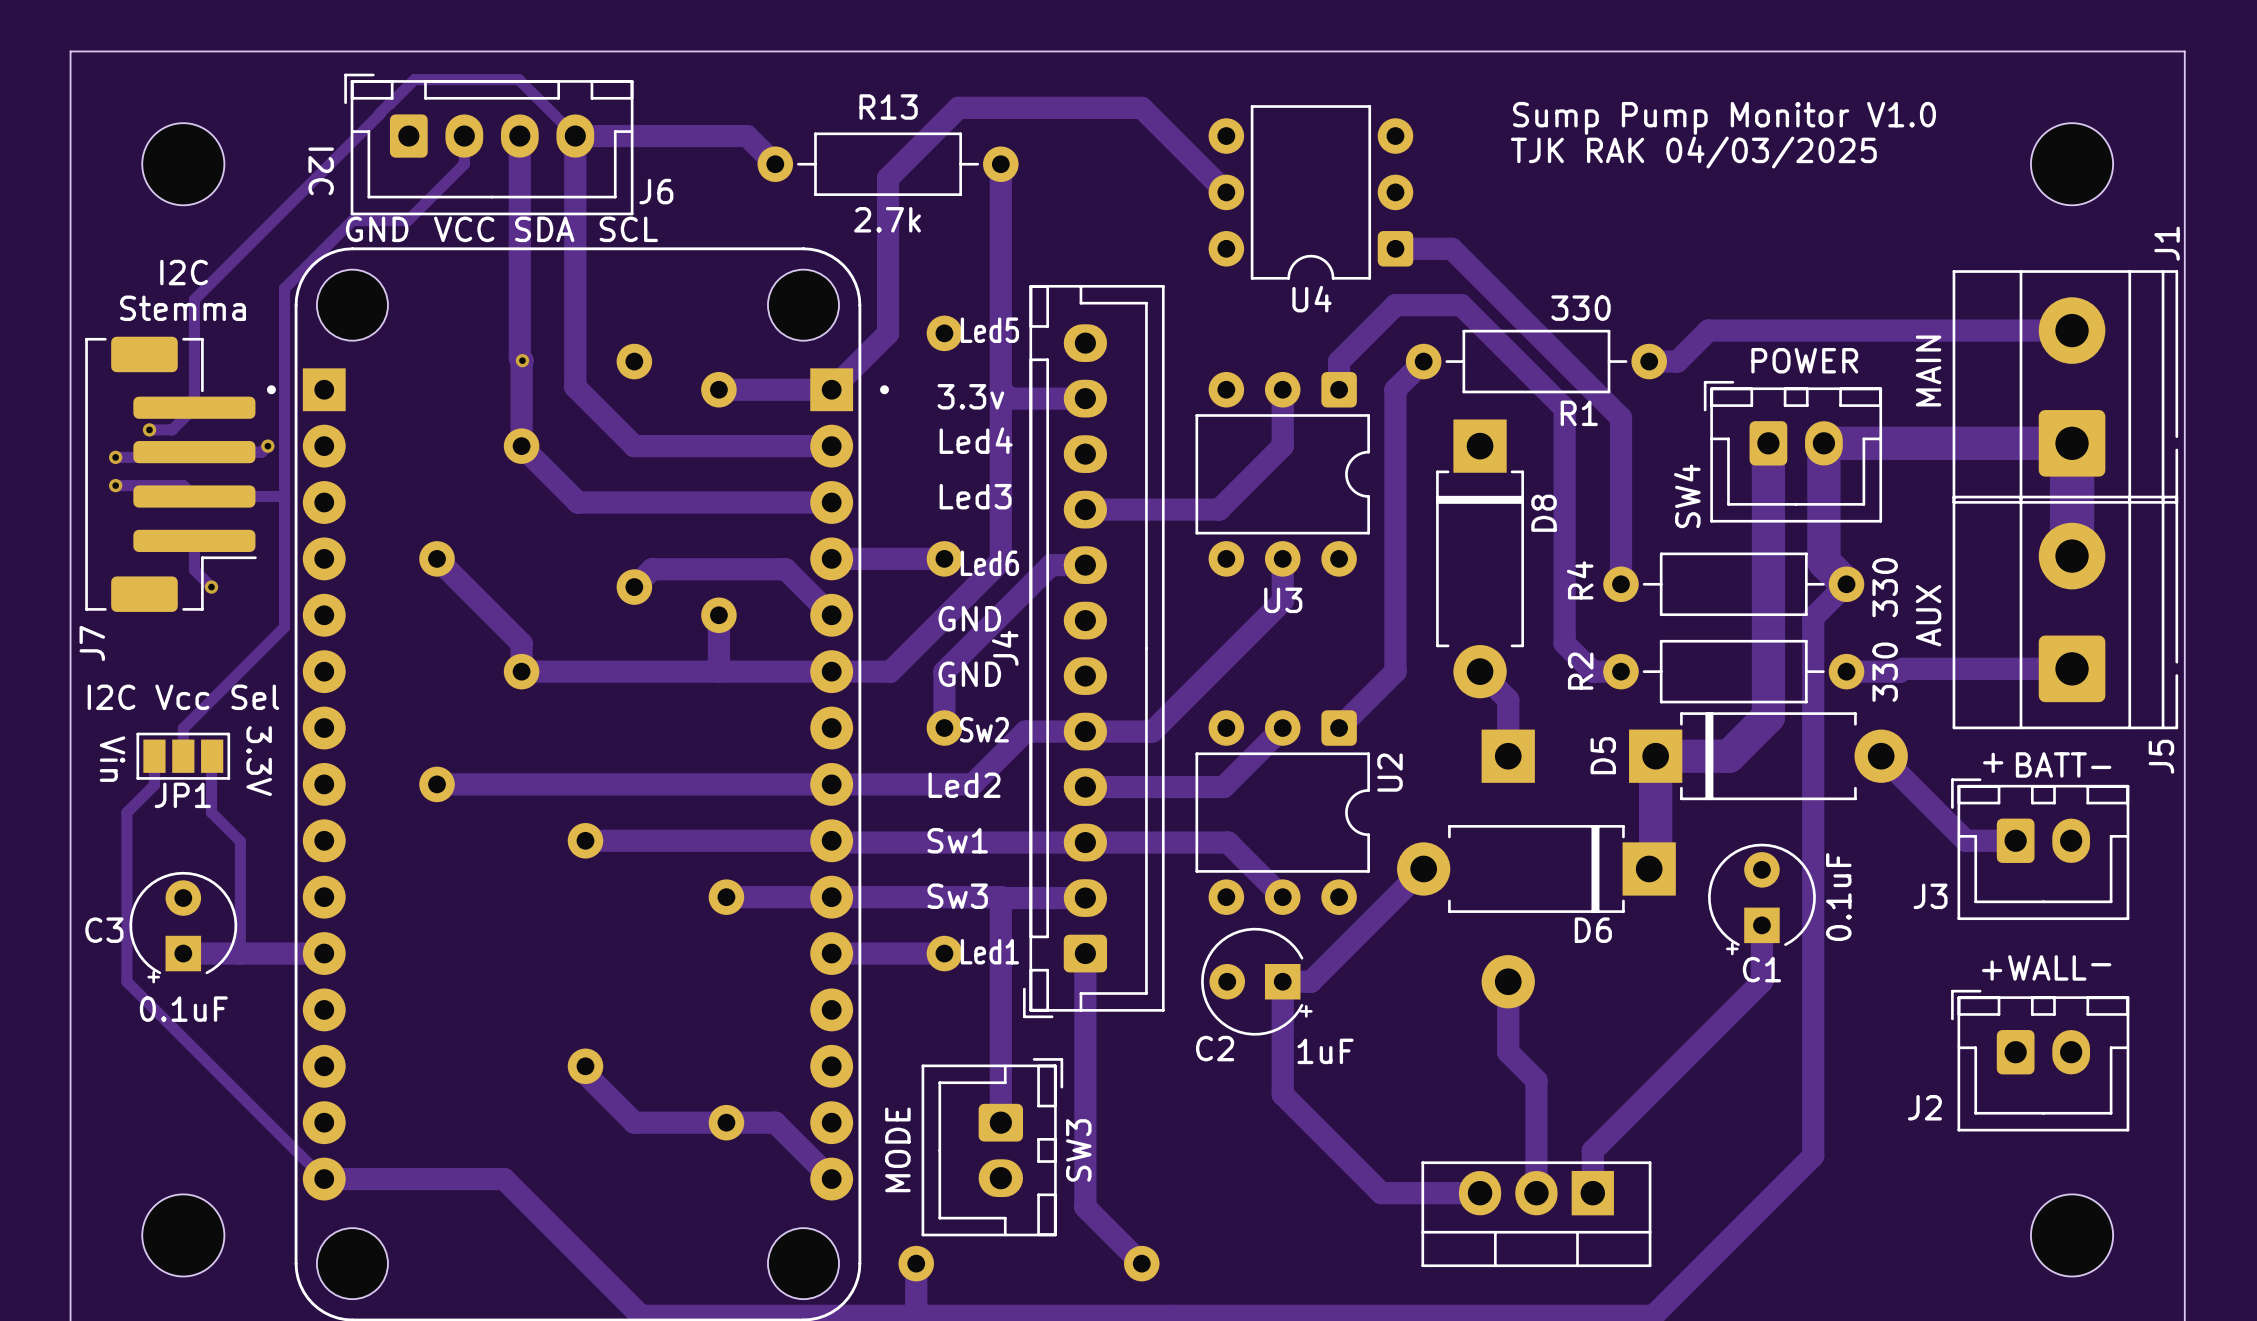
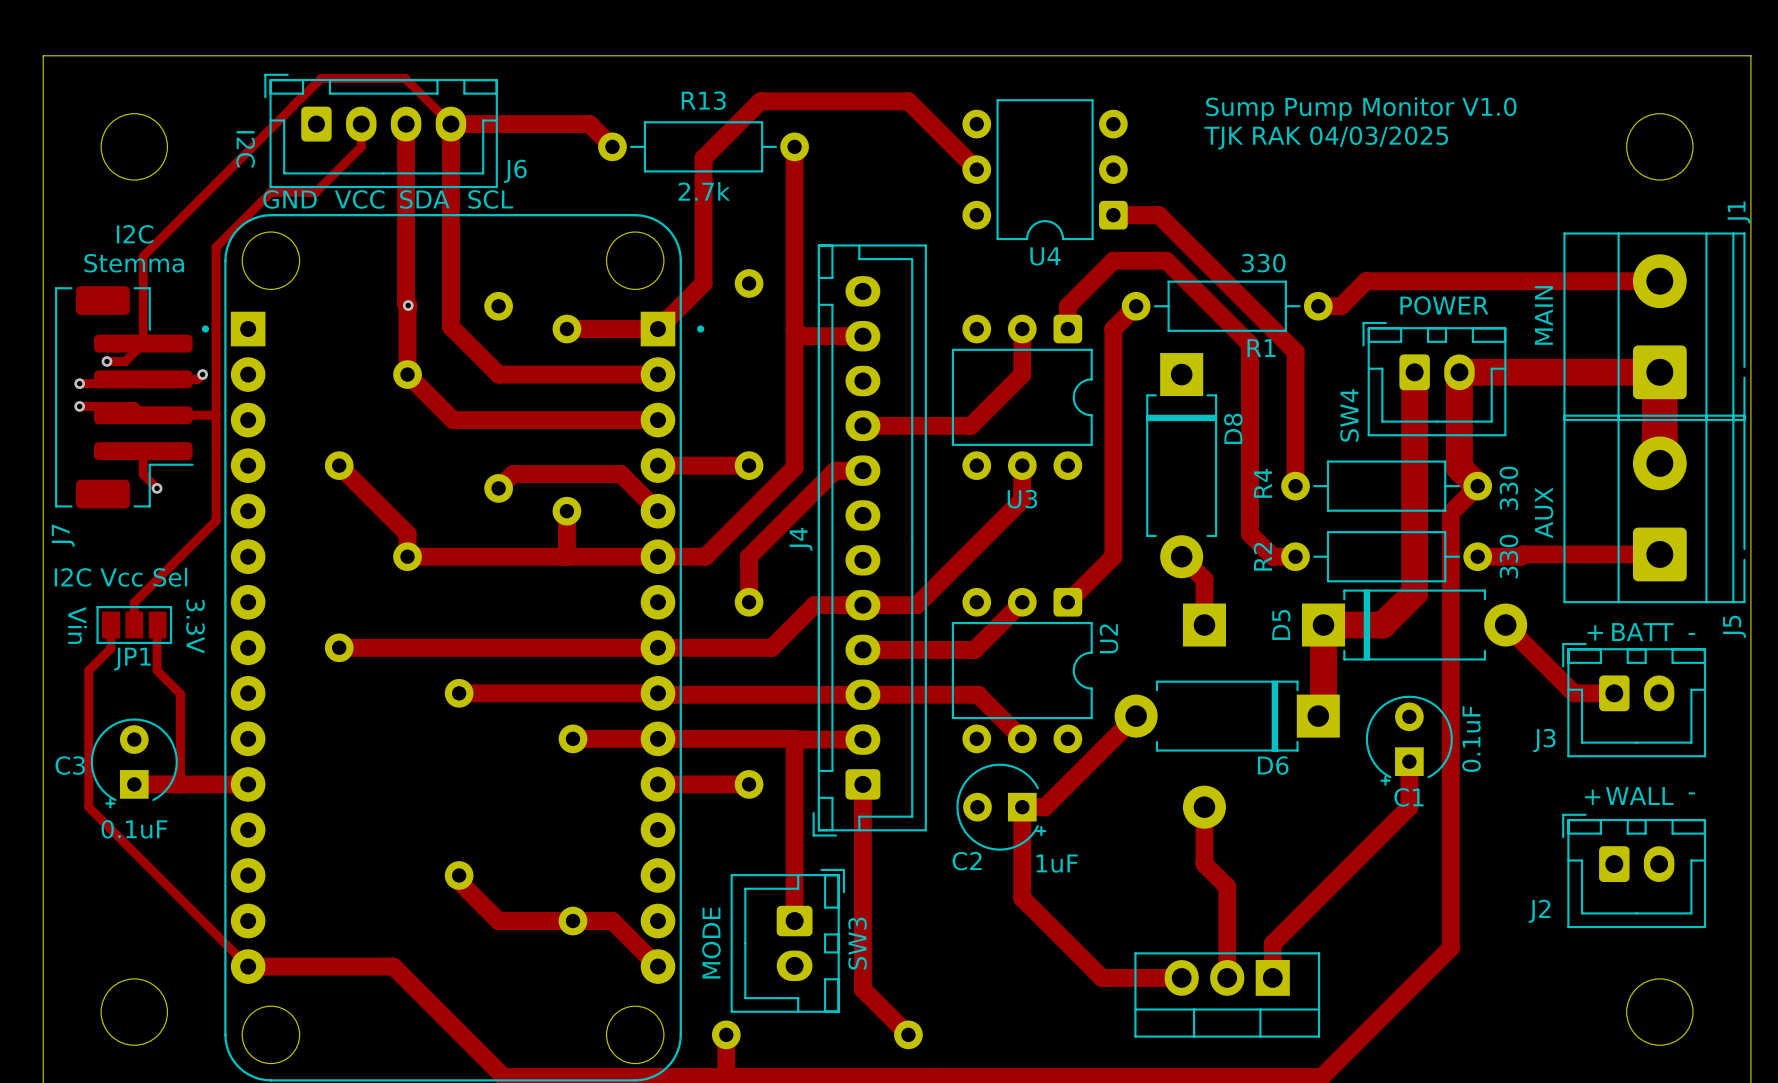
text: Led5 (989, 330) -> none
text: 3.3v (970, 396) -> none
text: Led4 (976, 440) -> none
text: Led3 (975, 496) -> none
text: Led6 (989, 563) -> none
text: GND (969, 618) -> none
text: GND (969, 674) -> none
text: Sw2 (984, 729) -> none
text: Led2 (964, 785) -> none
text: Sw1 (957, 840) -> none
text: Sw3 (957, 896) -> none
text: Led1 (989, 951) -> none

